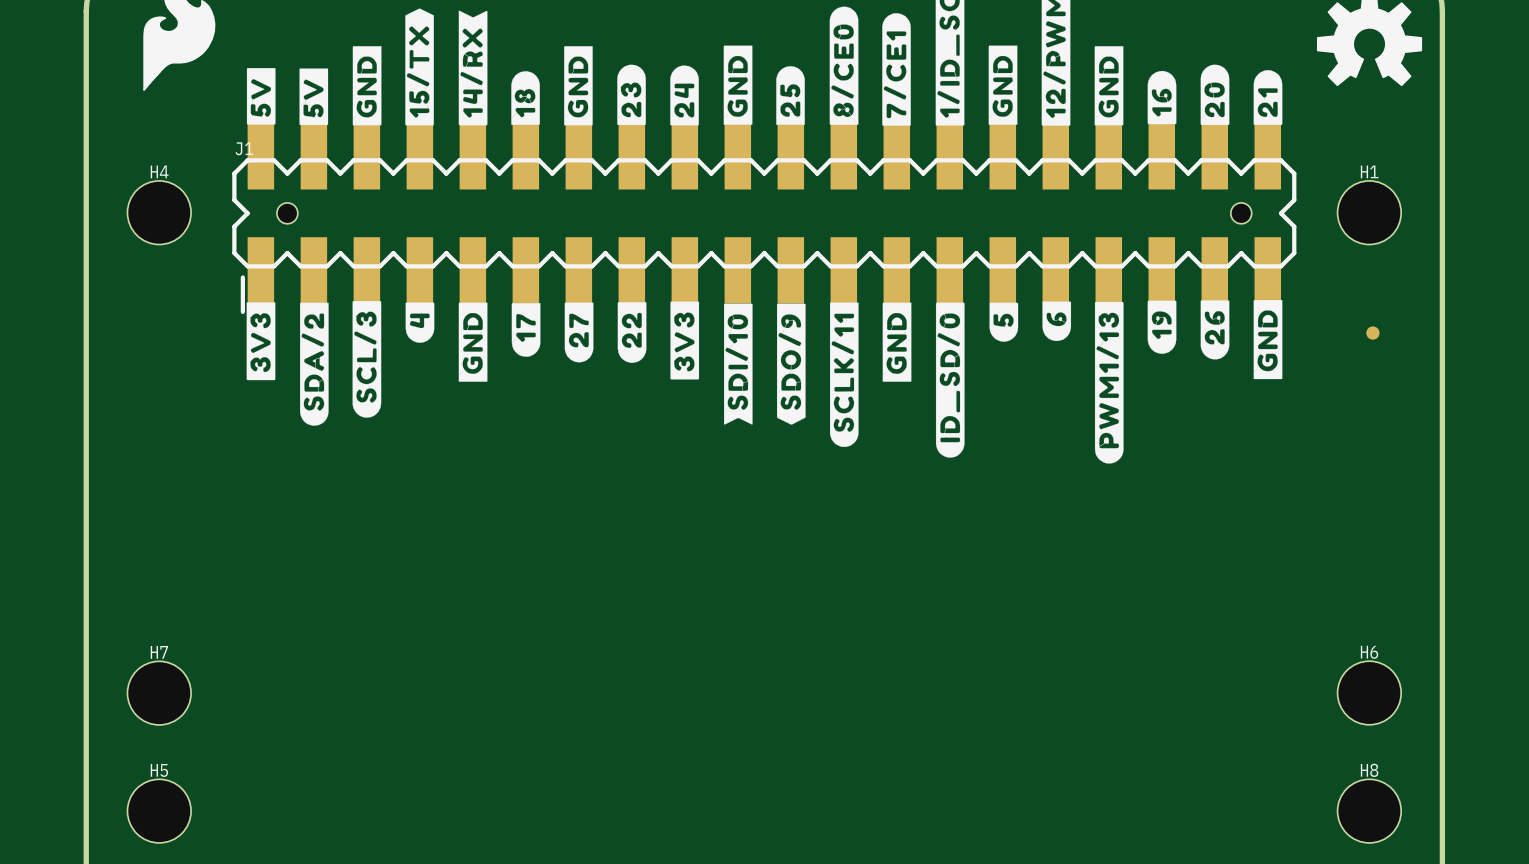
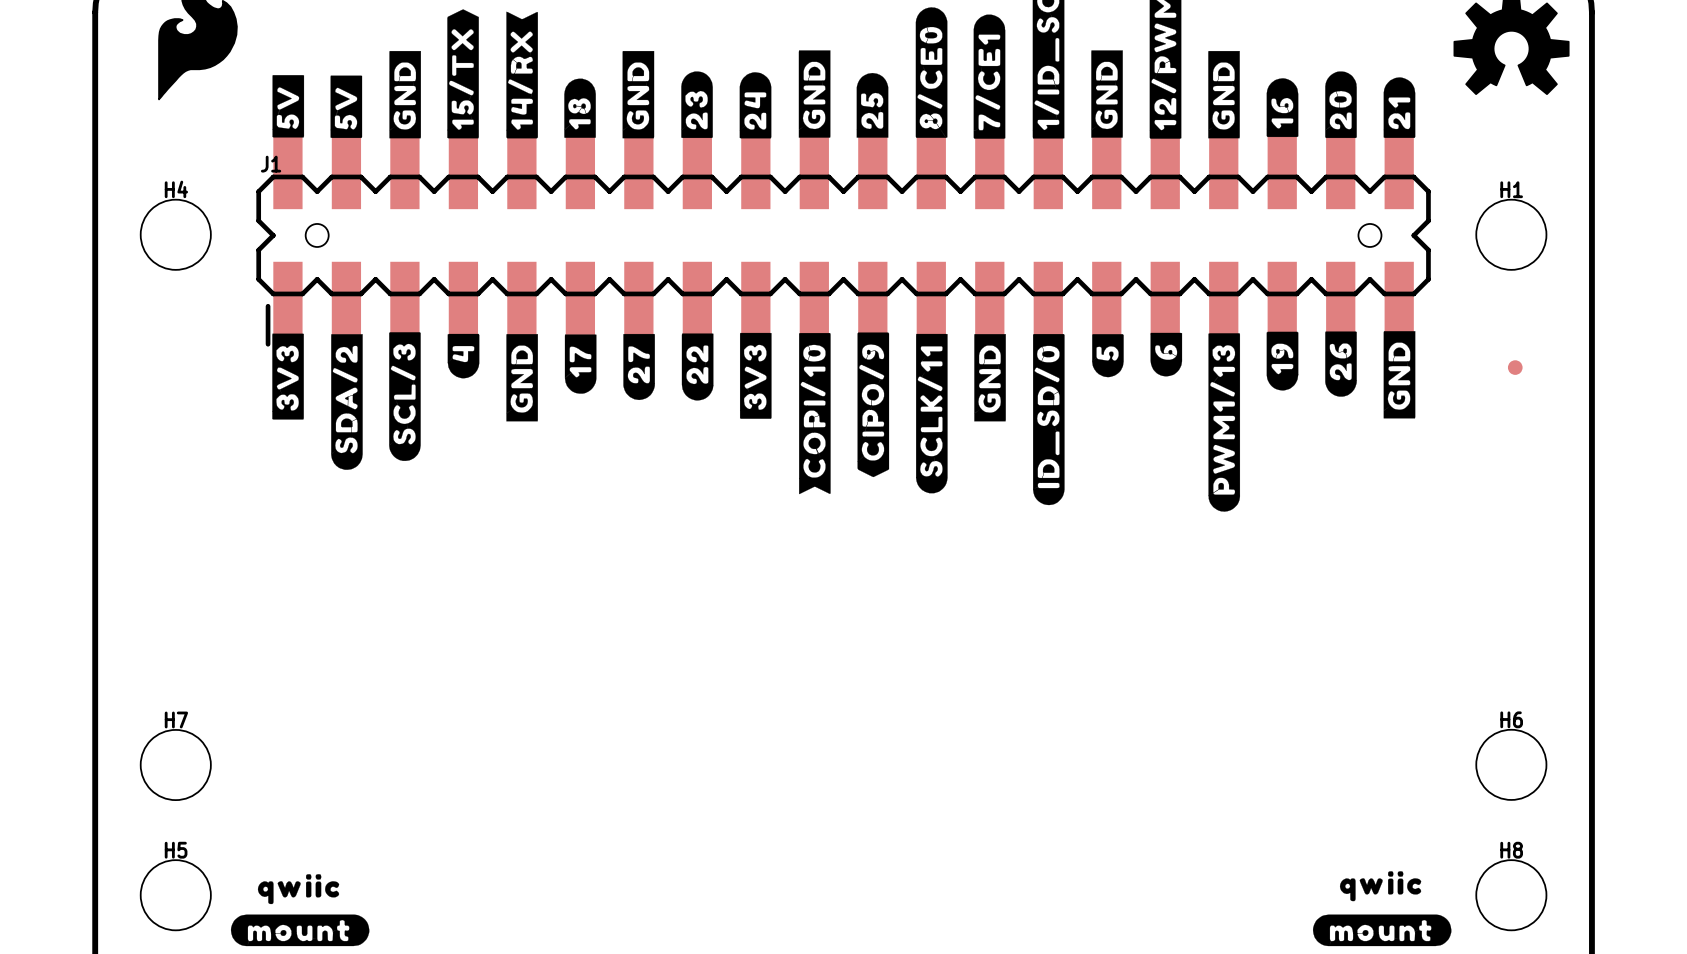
drawing shape: [723, 303, 753, 425] -> [799, 332, 831, 495]
drawing shape: [776, 303, 806, 425] -> [857, 332, 890, 478]
drawing: none -> [1312, 871, 1452, 947]
drawing: none -> [230, 874, 370, 947]

